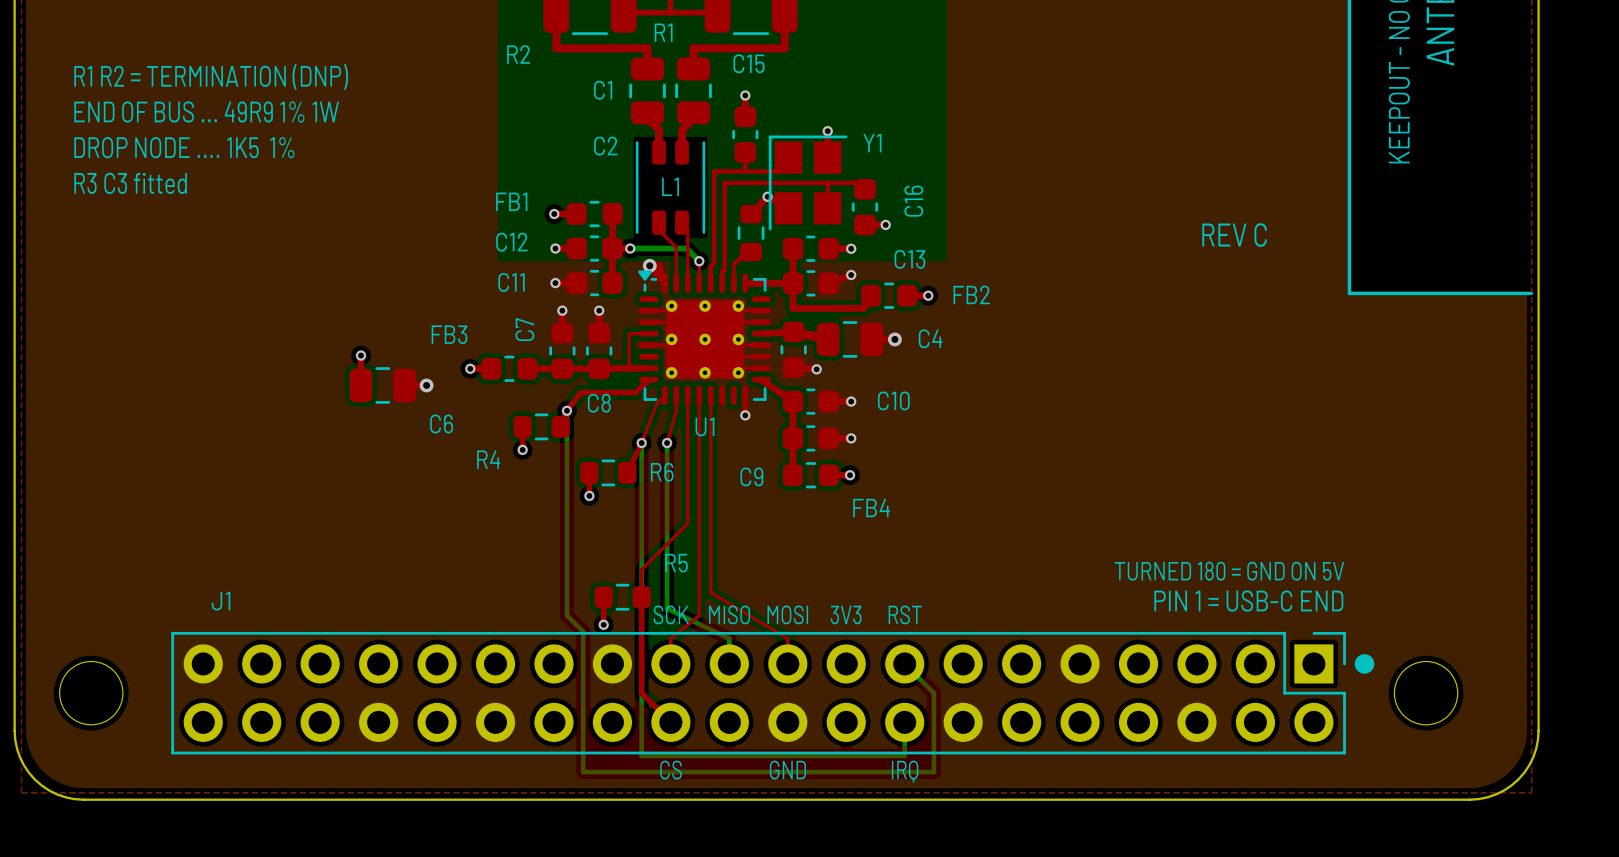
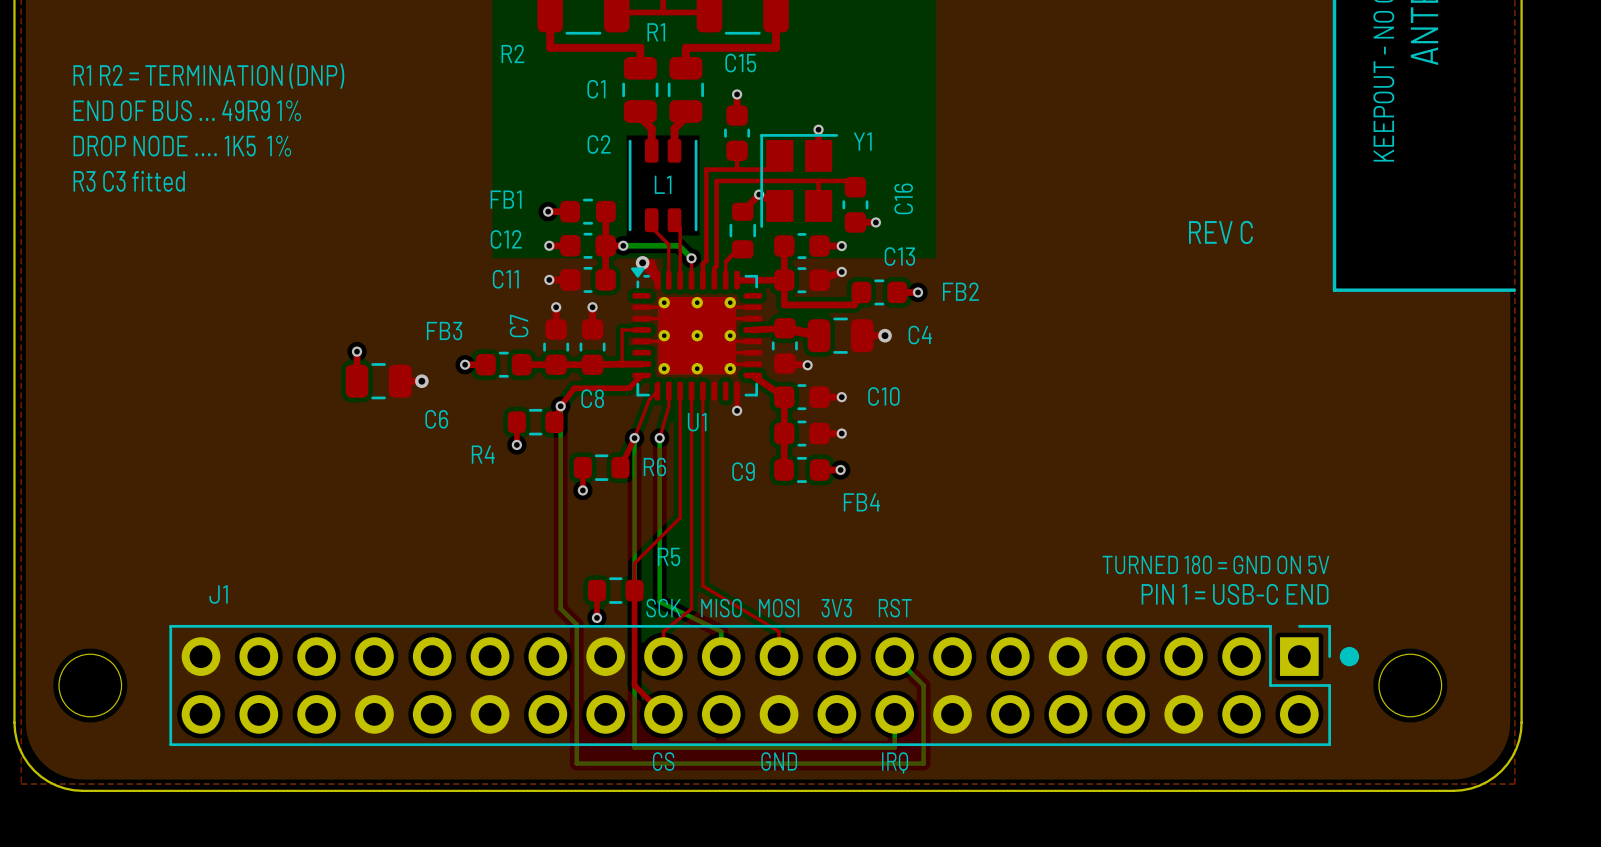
text: END OF BUS ... 49R9 1% 1W (206, 111) -> END OF BUS ... 49R9 1% (187, 110)

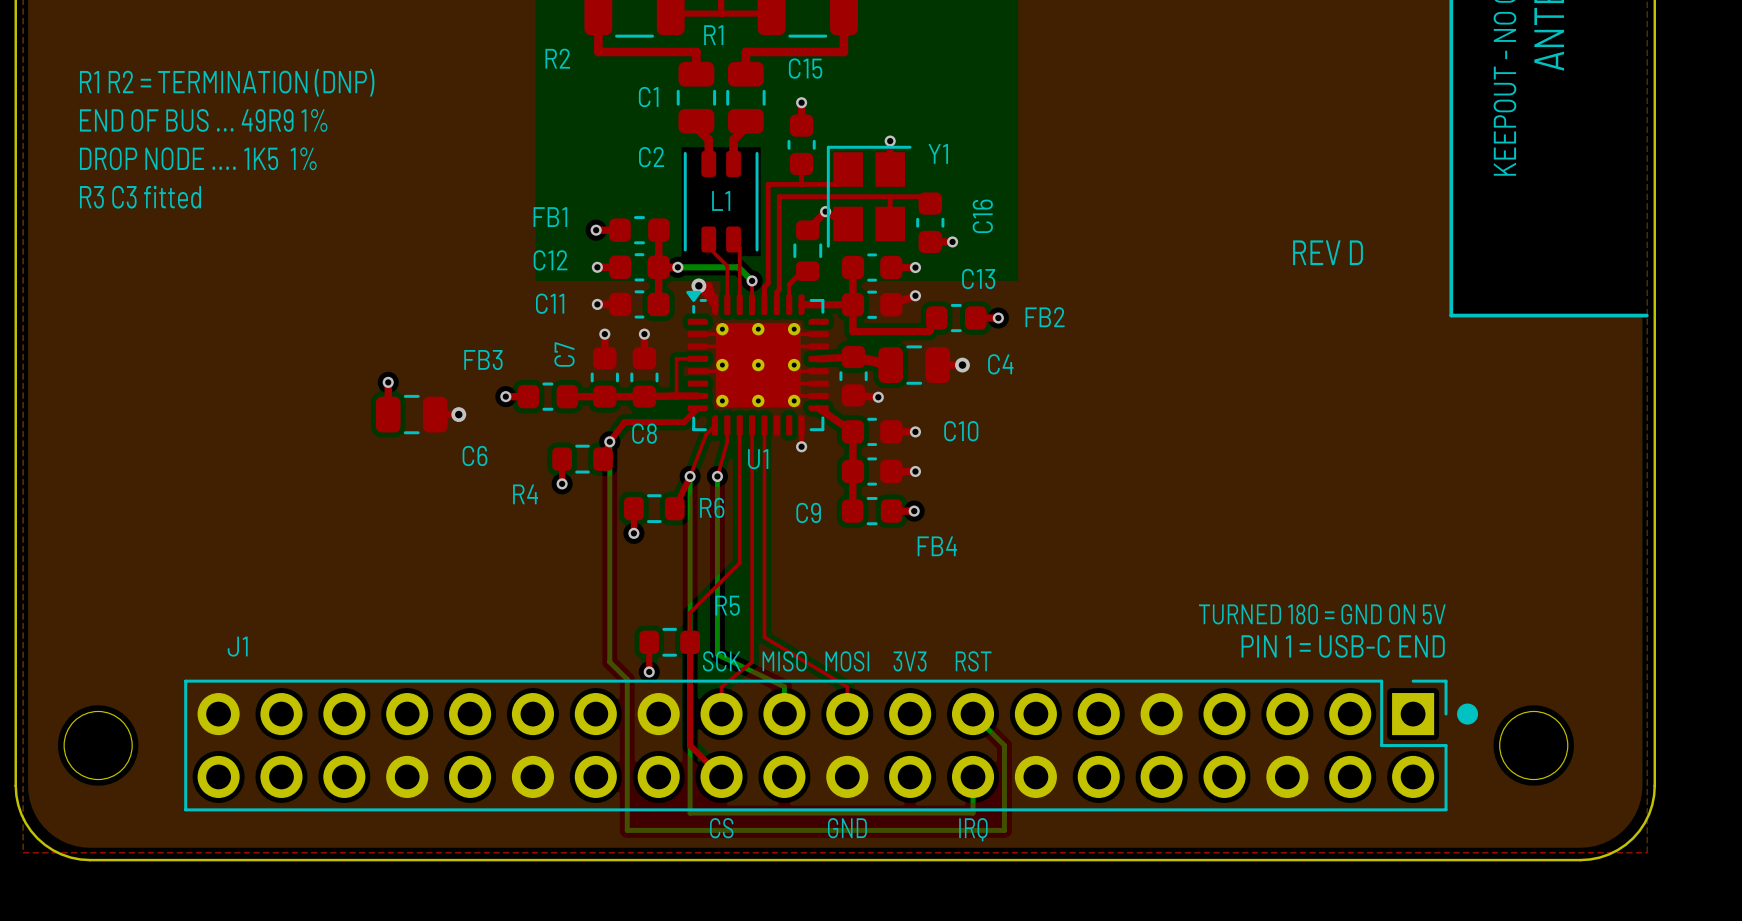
text: REV C (1220, 232) -> REV D (1328, 252)

